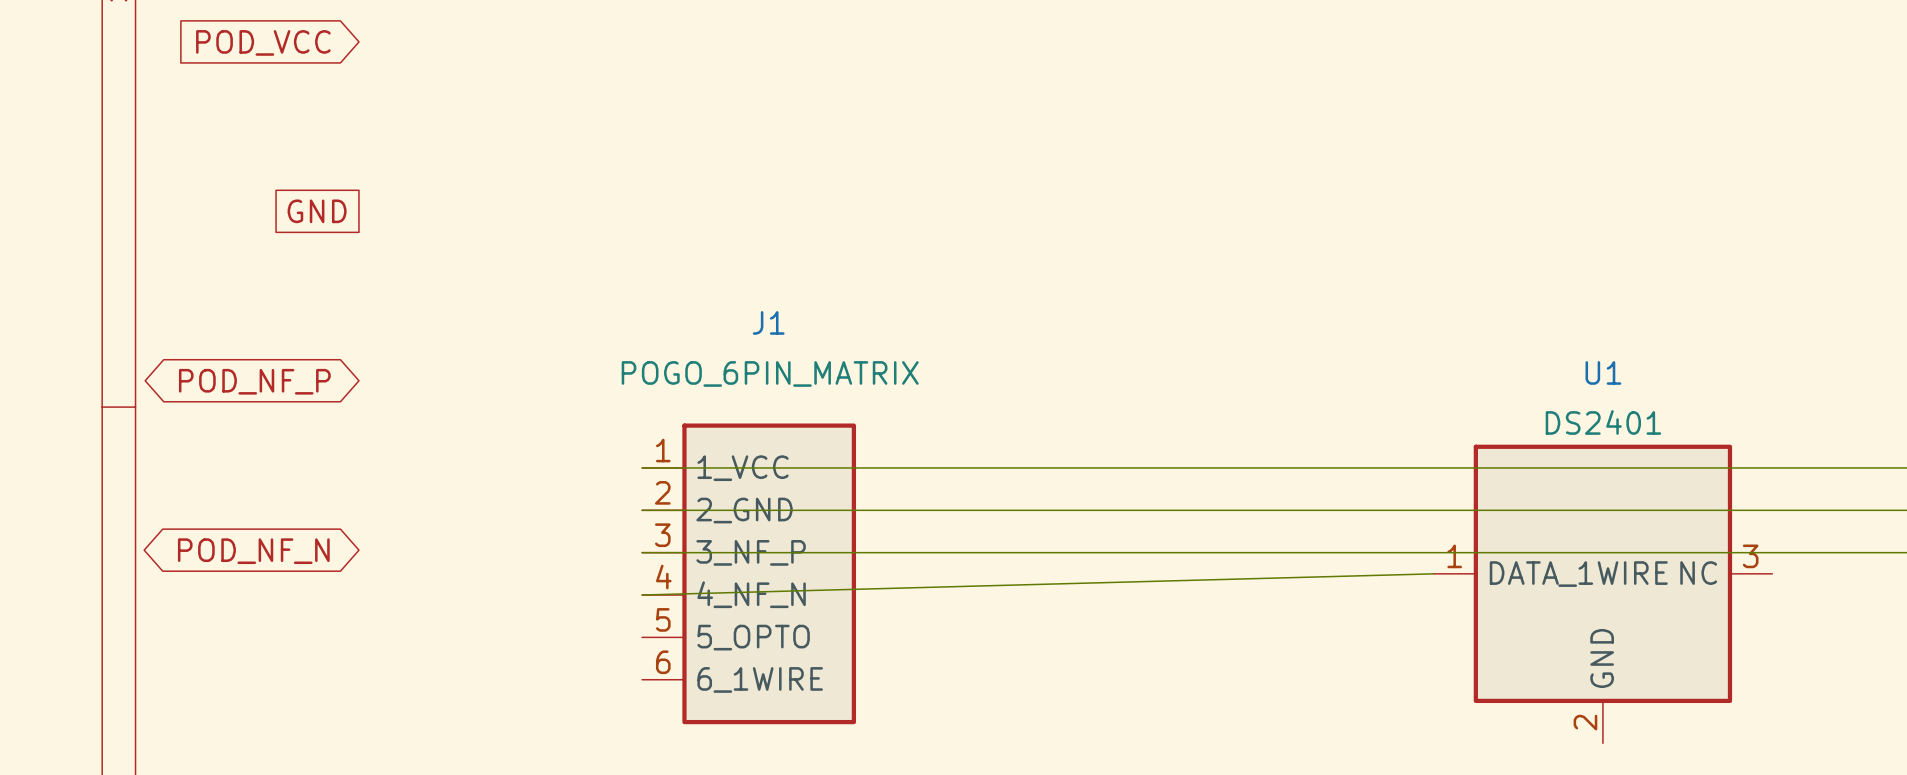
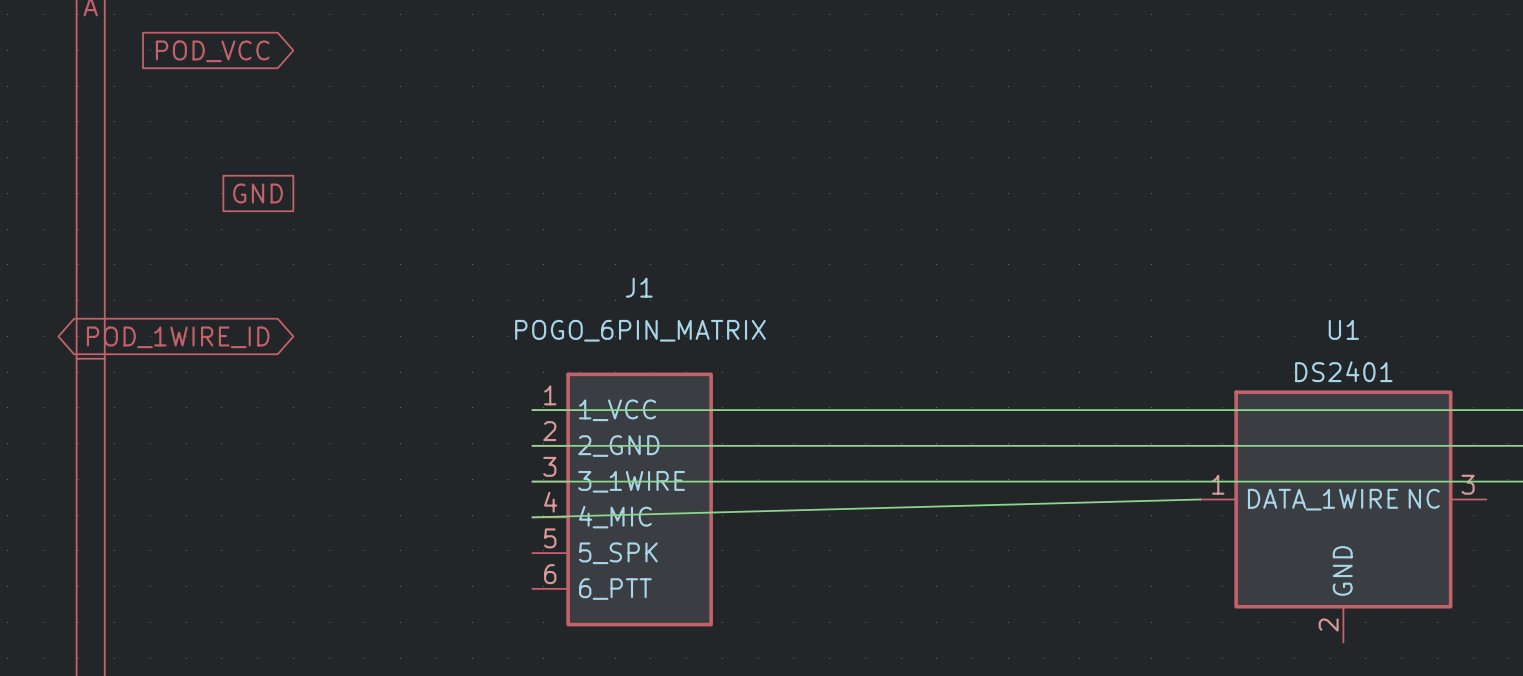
global label: POD_NF_P (254, 381) -> POD_1WIRE_ID (178, 337)
global label: POD_NF_N (253, 551) -> none
J1 pin name: 3_NF_P (751, 552) -> 3_1WIRE (631, 481)
J1 pin name: 4_NF_N (751, 594) -> 4_MIC (615, 517)
J1 pin name: 5_OPTO (753, 637) -> 5_SPK (618, 553)
J1 pin name: 6_1WIRE (760, 679) -> 6_PTT (615, 589)

